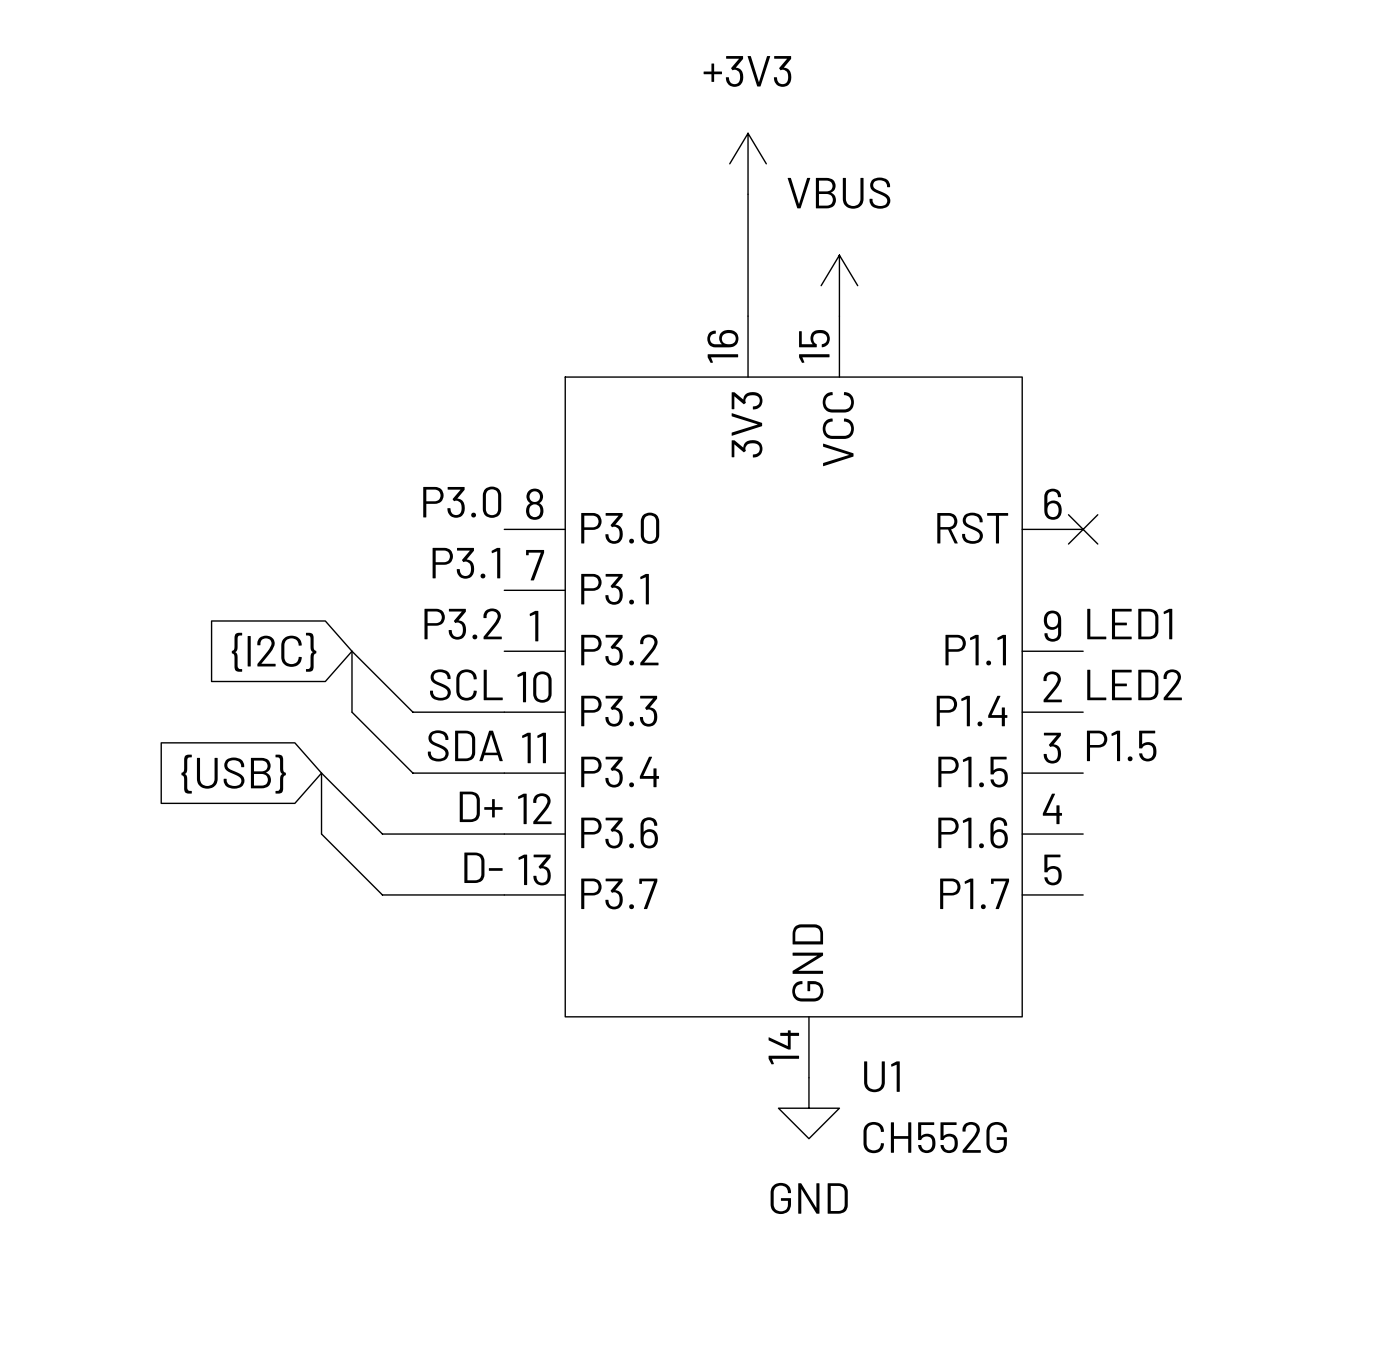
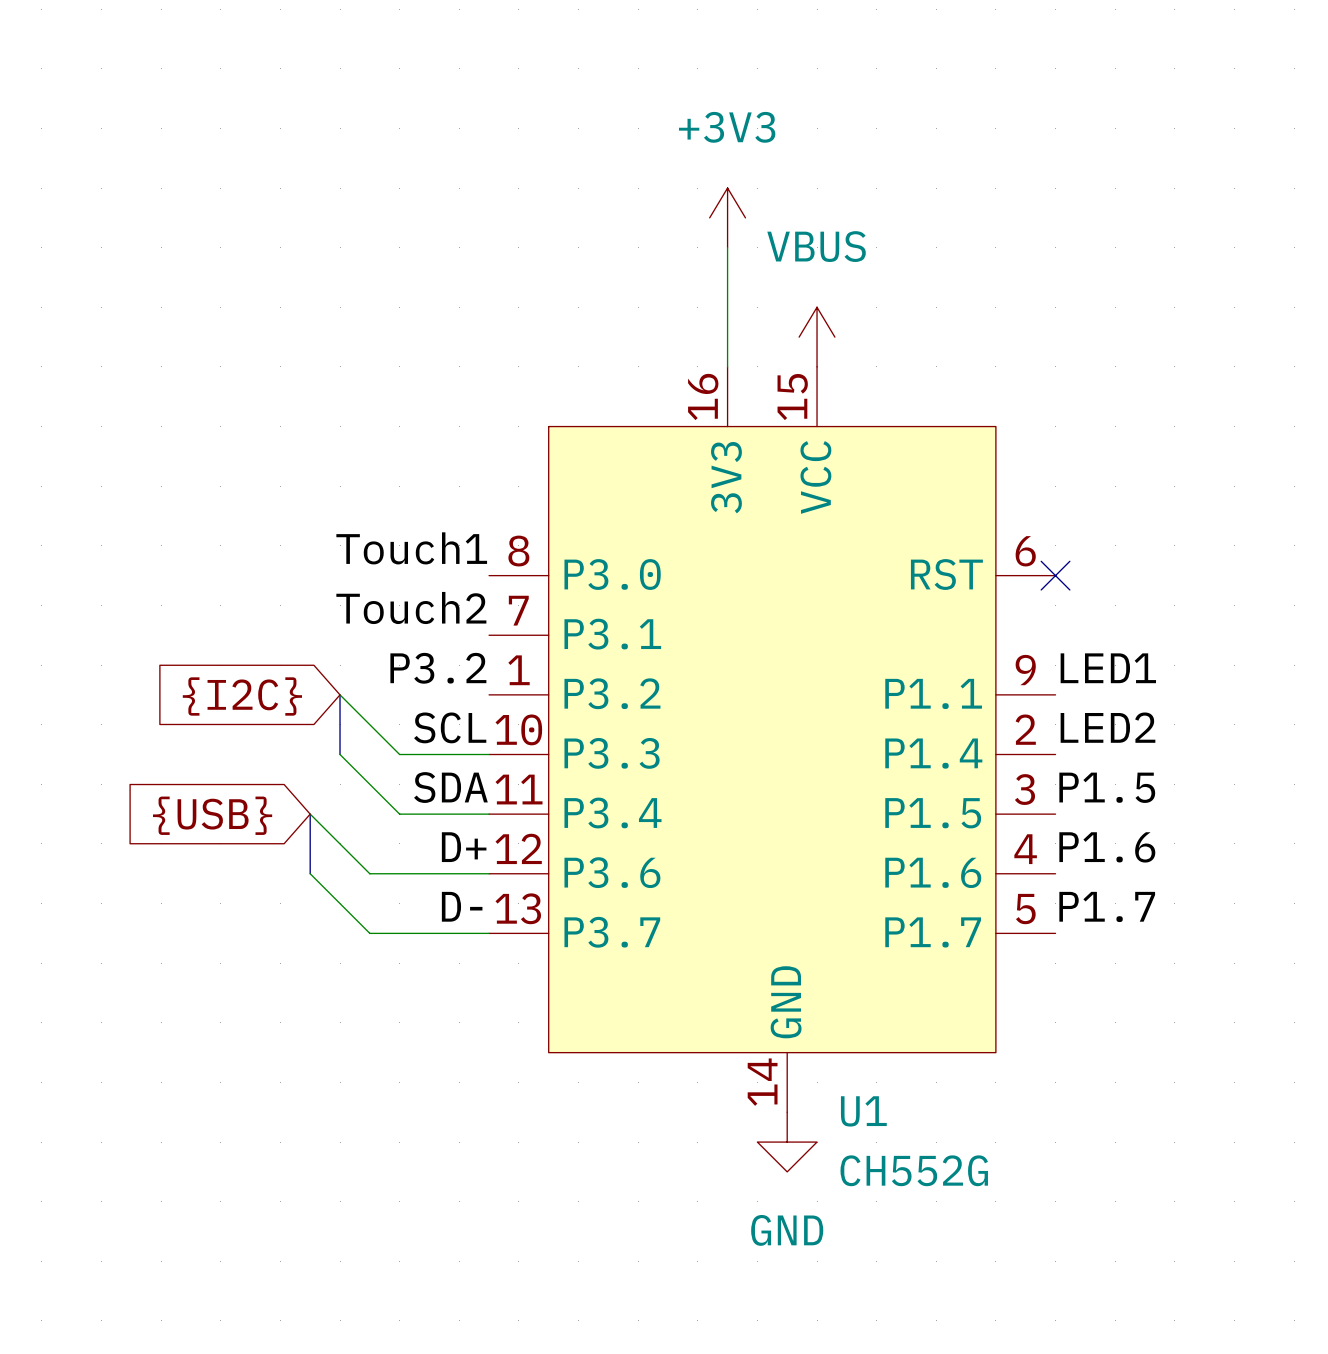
label: P3.0 (462, 502) -> Touch1 (411, 548)
label: P3.1 (466, 563) -> Touch2 (411, 608)
label: none -> P1.6 (1107, 847)
label: none -> P1.7 (1107, 906)

